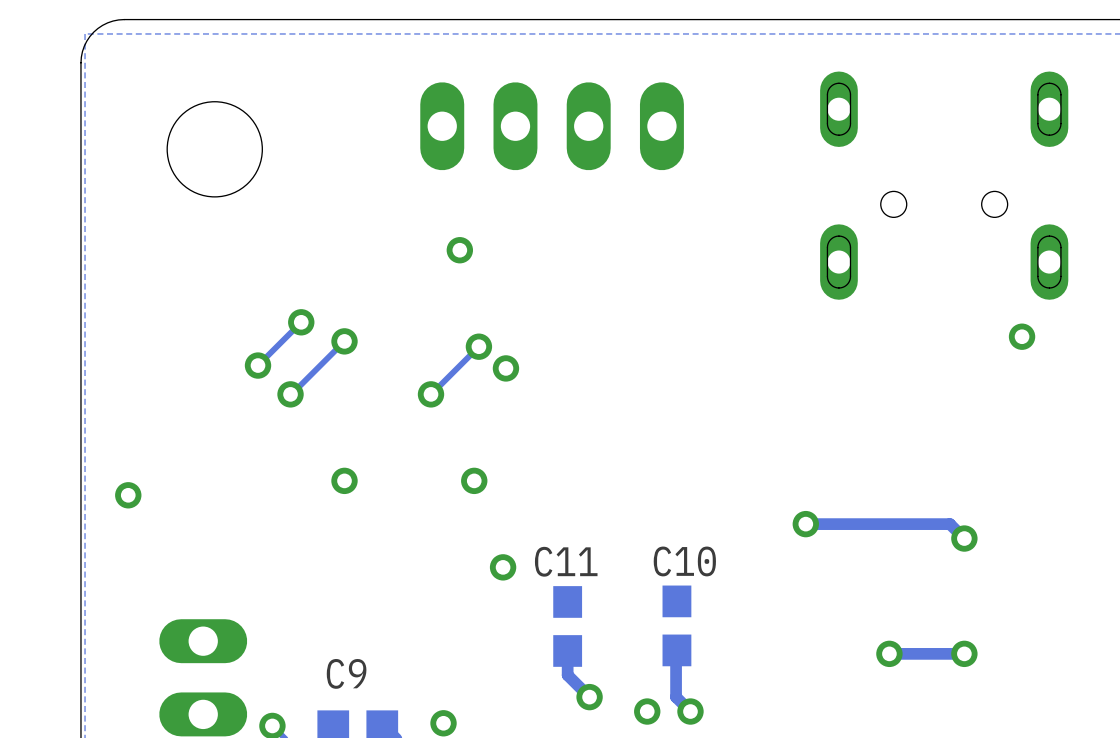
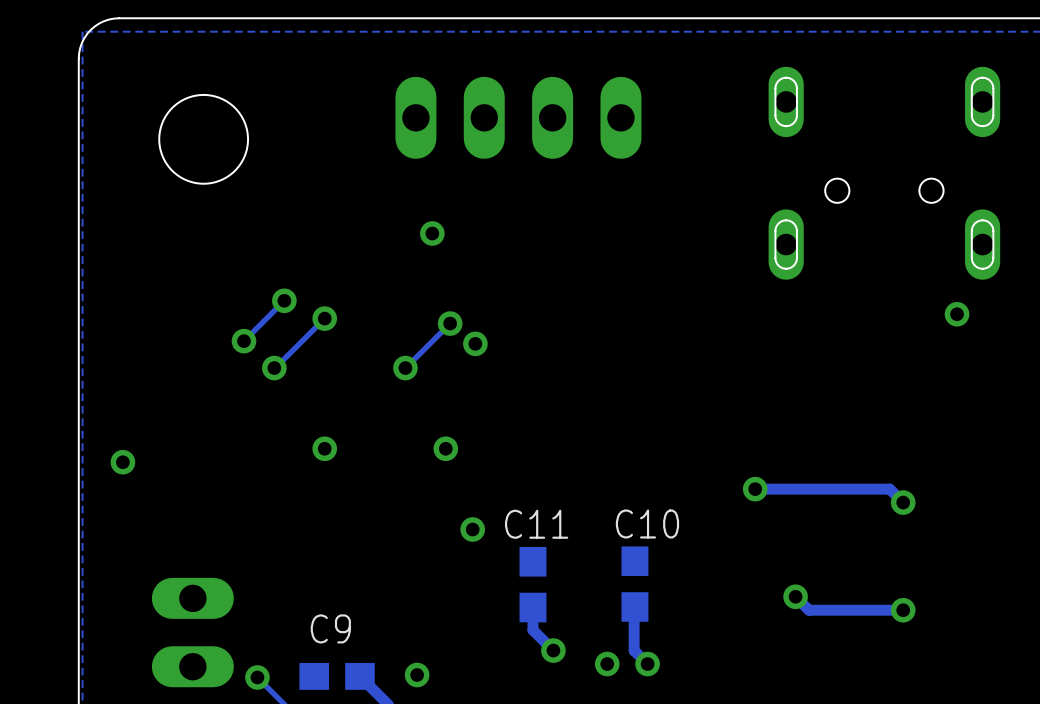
track: none -> (795, 596) (809, 610) (833, 610)
via position: (889, 653) -> (795, 596)

